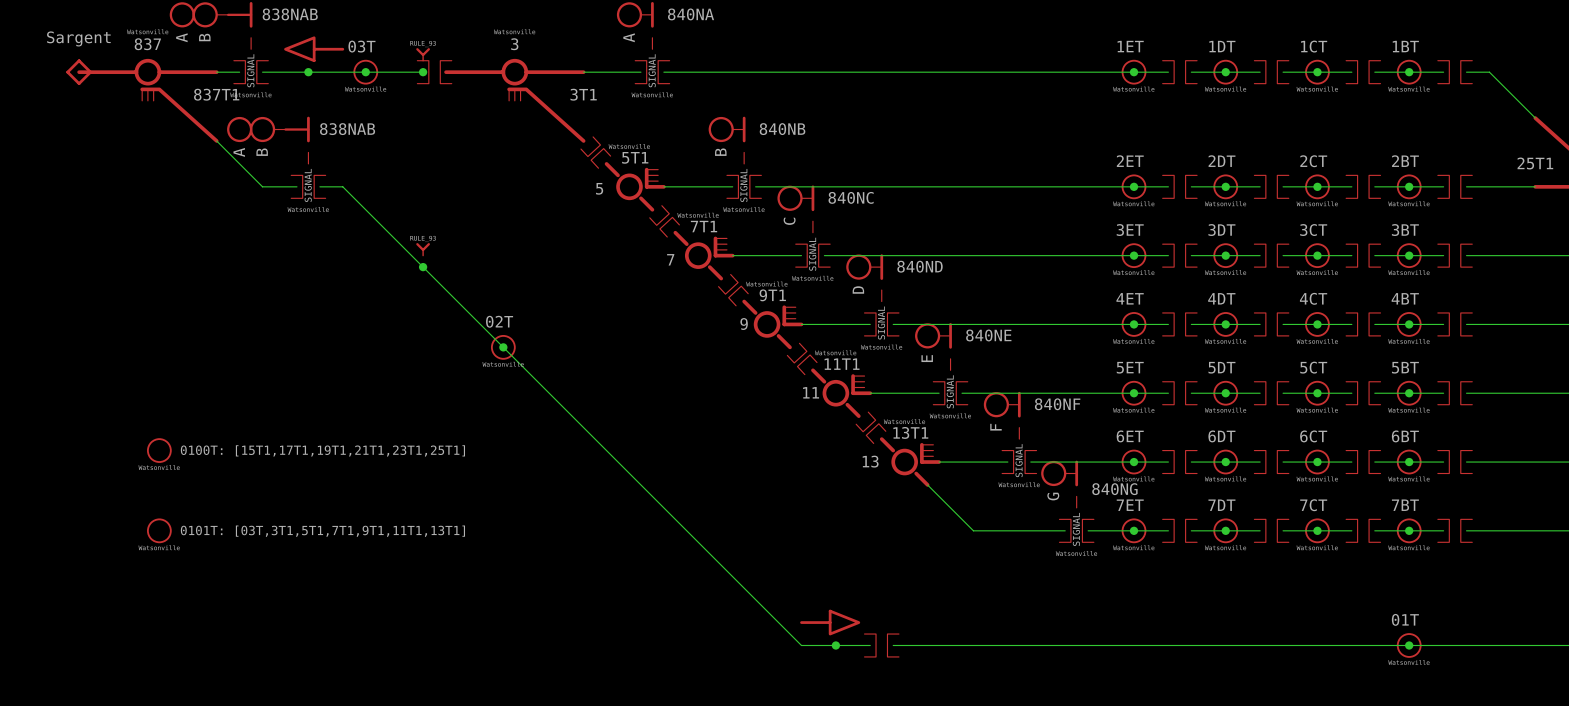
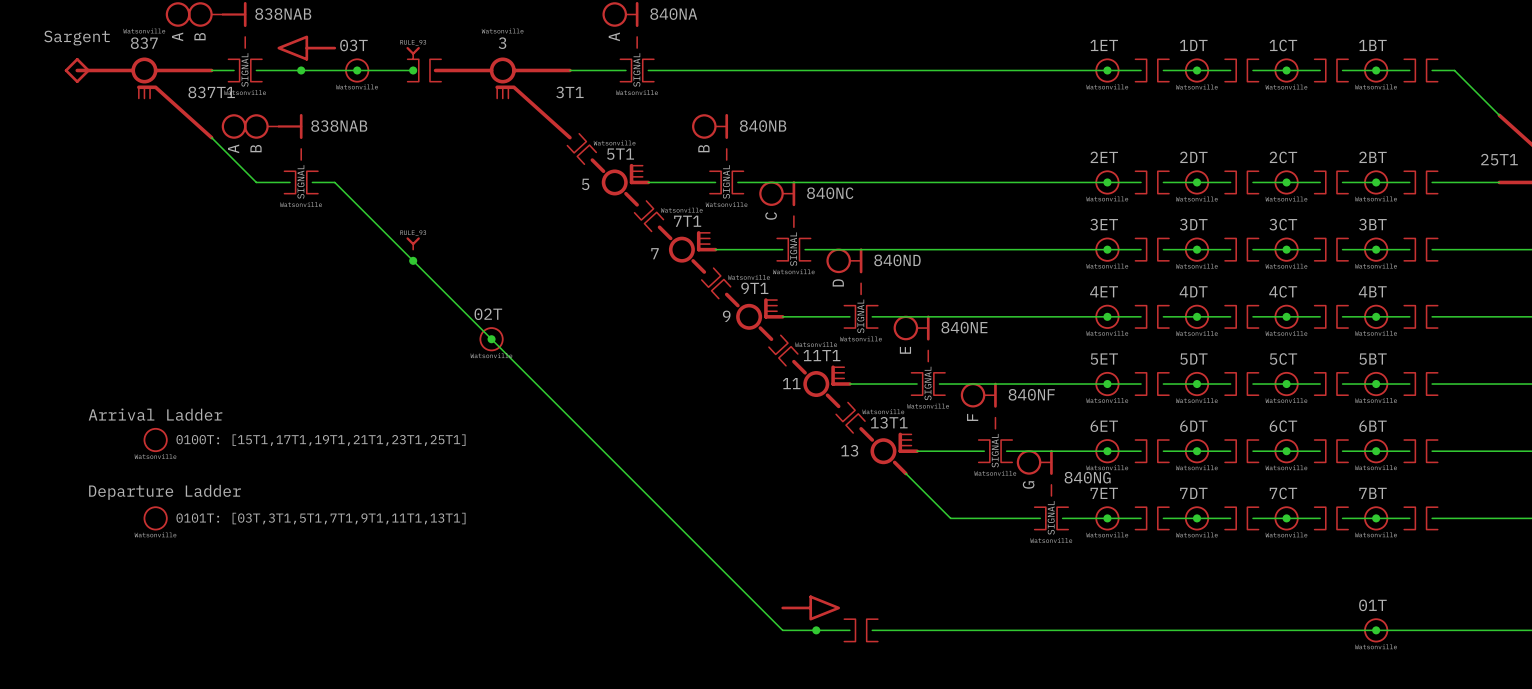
part text: none -> Arrival Ladder (155, 414)
part text: none -> Departure Ladder (165, 492)

